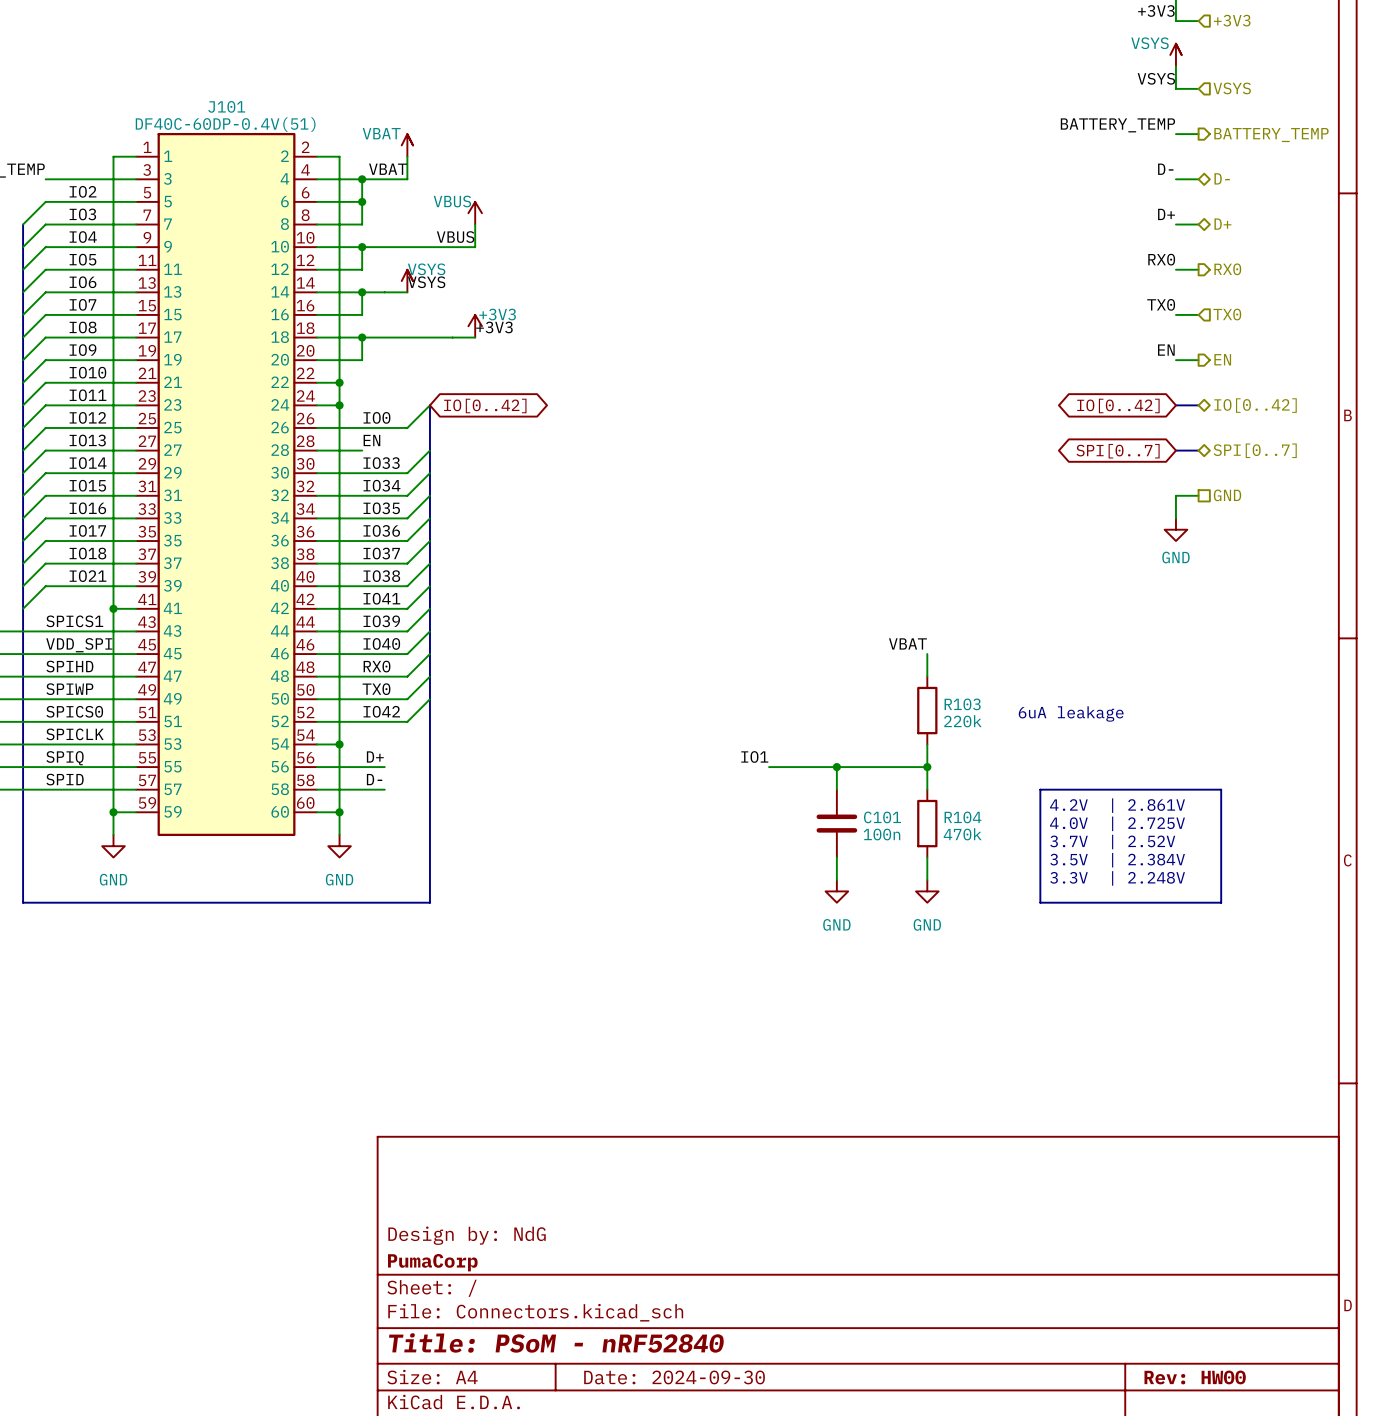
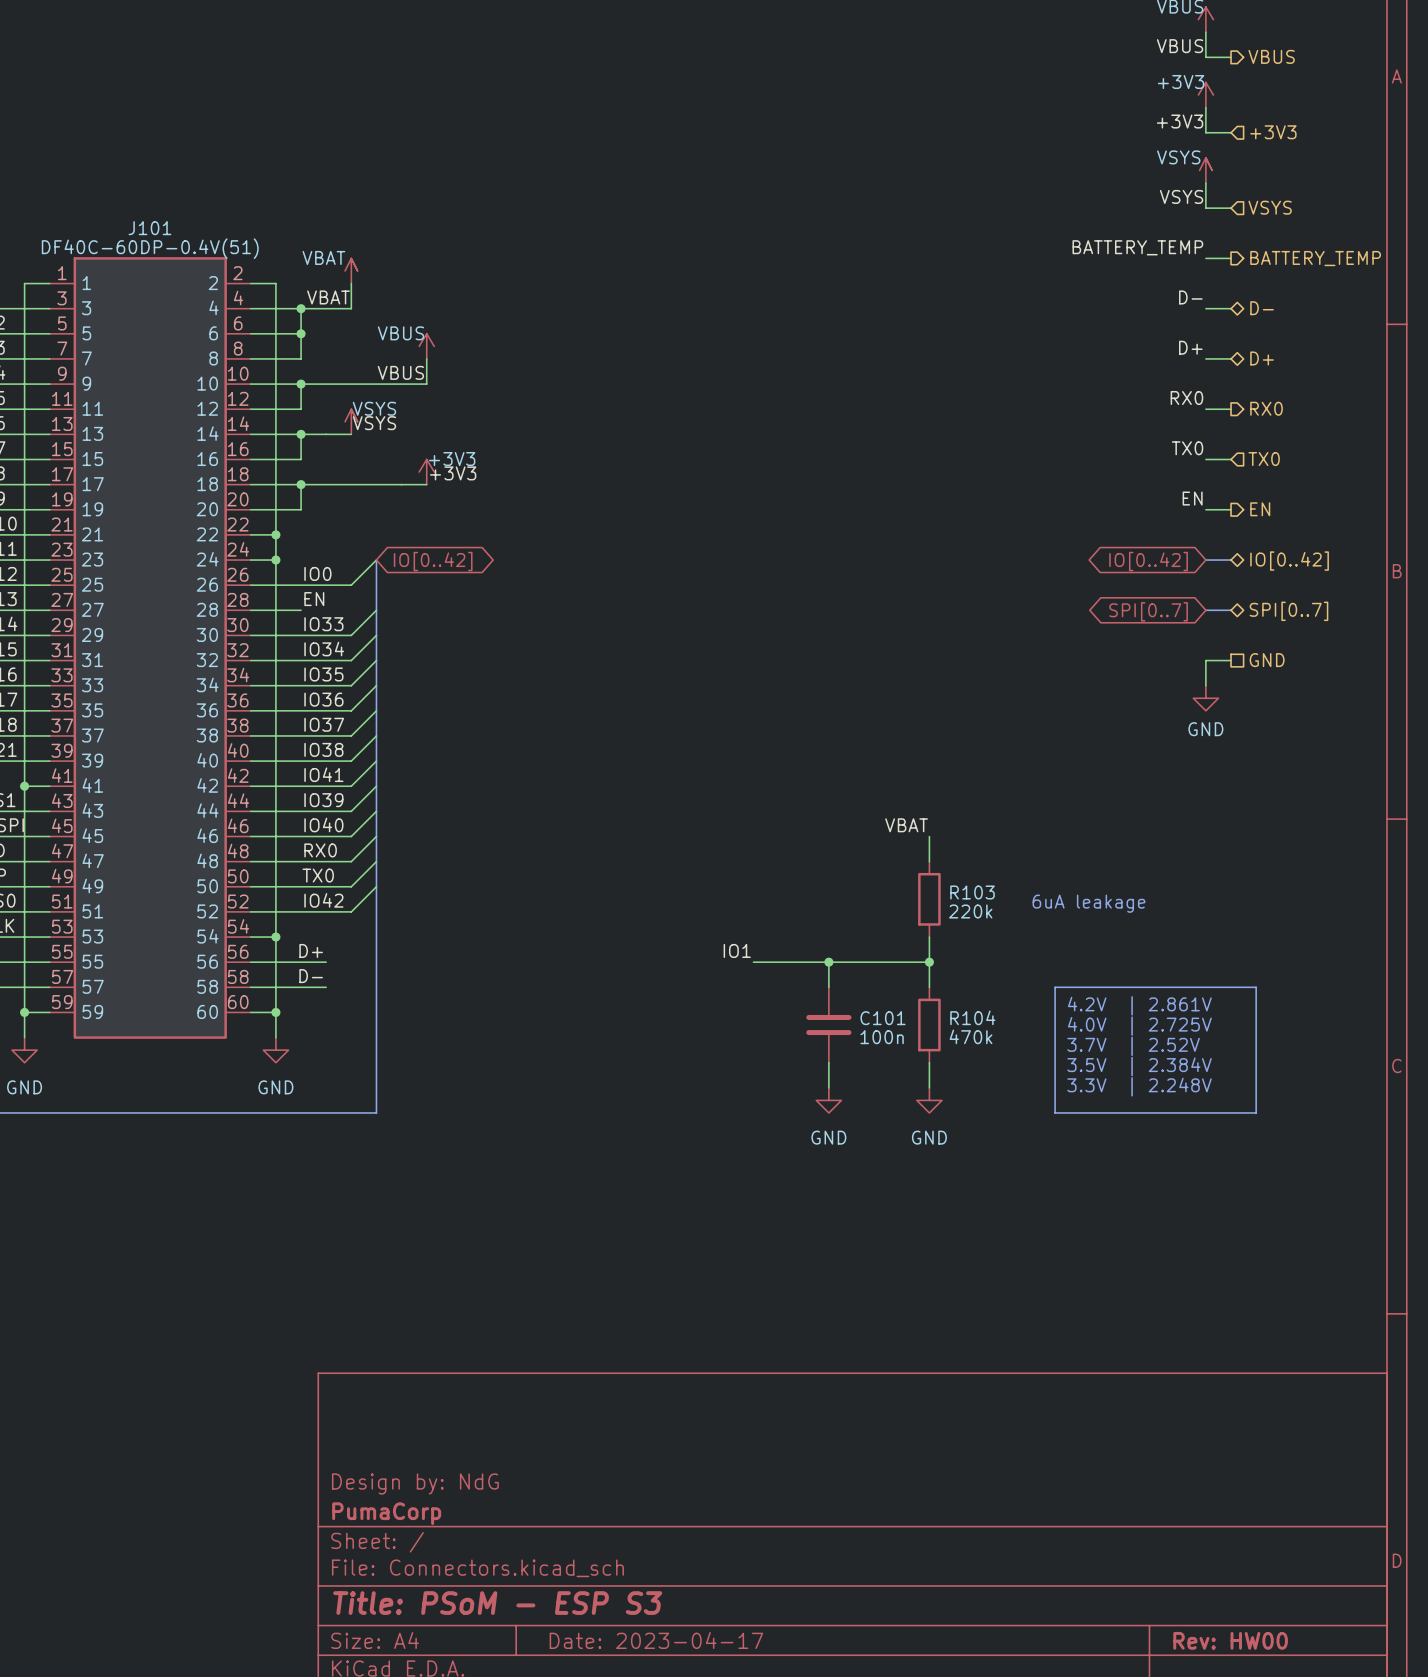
title block: Title: PSoM - nRF52840 (556, 1342) -> Title: PSoM - ESP S3 (497, 1603)
title block: Date: 2024-09-30 (674, 1377) -> Date: 2023-04-17 (656, 1640)

